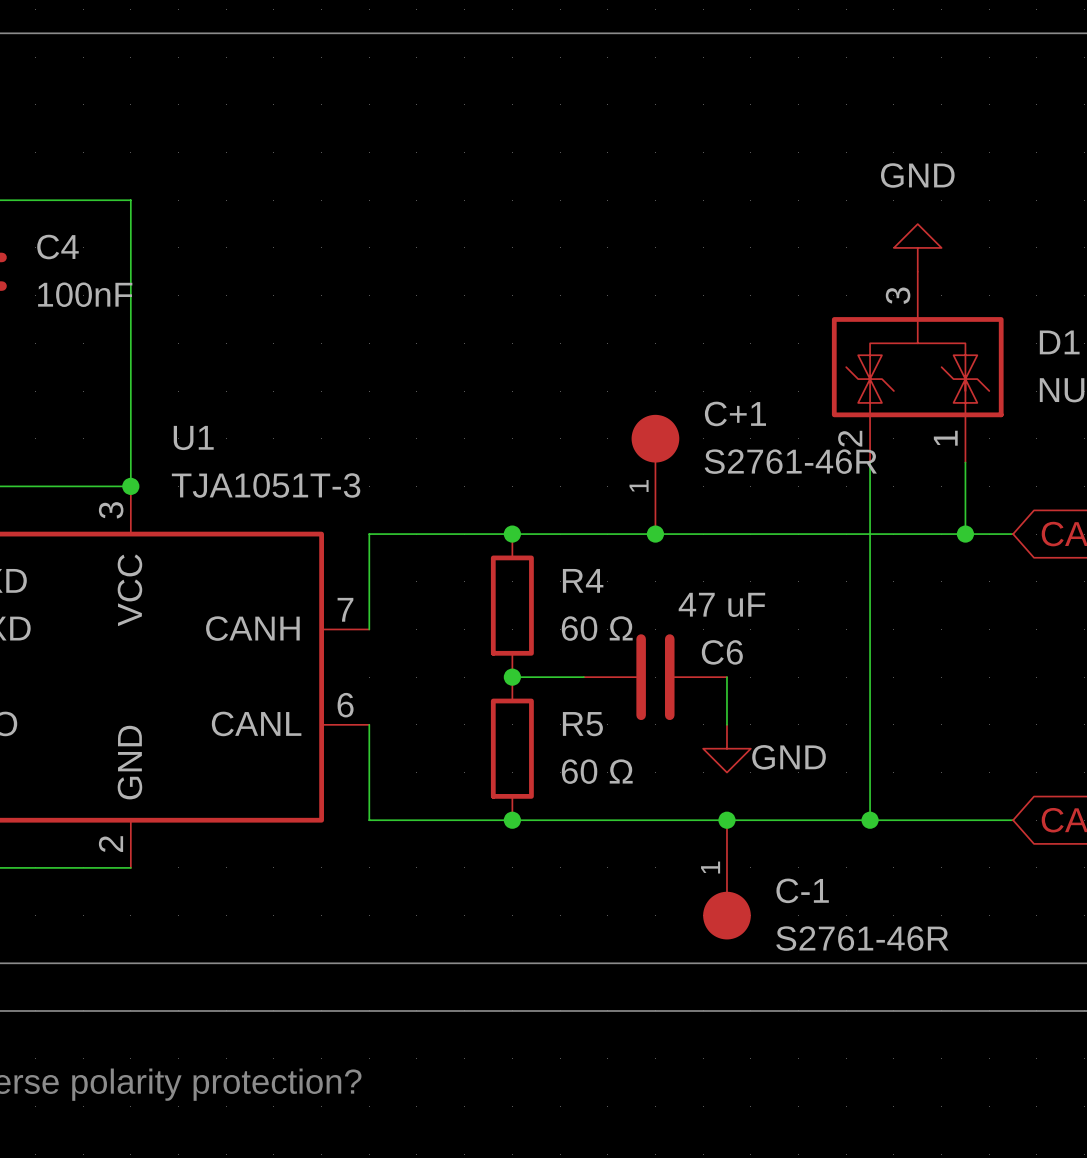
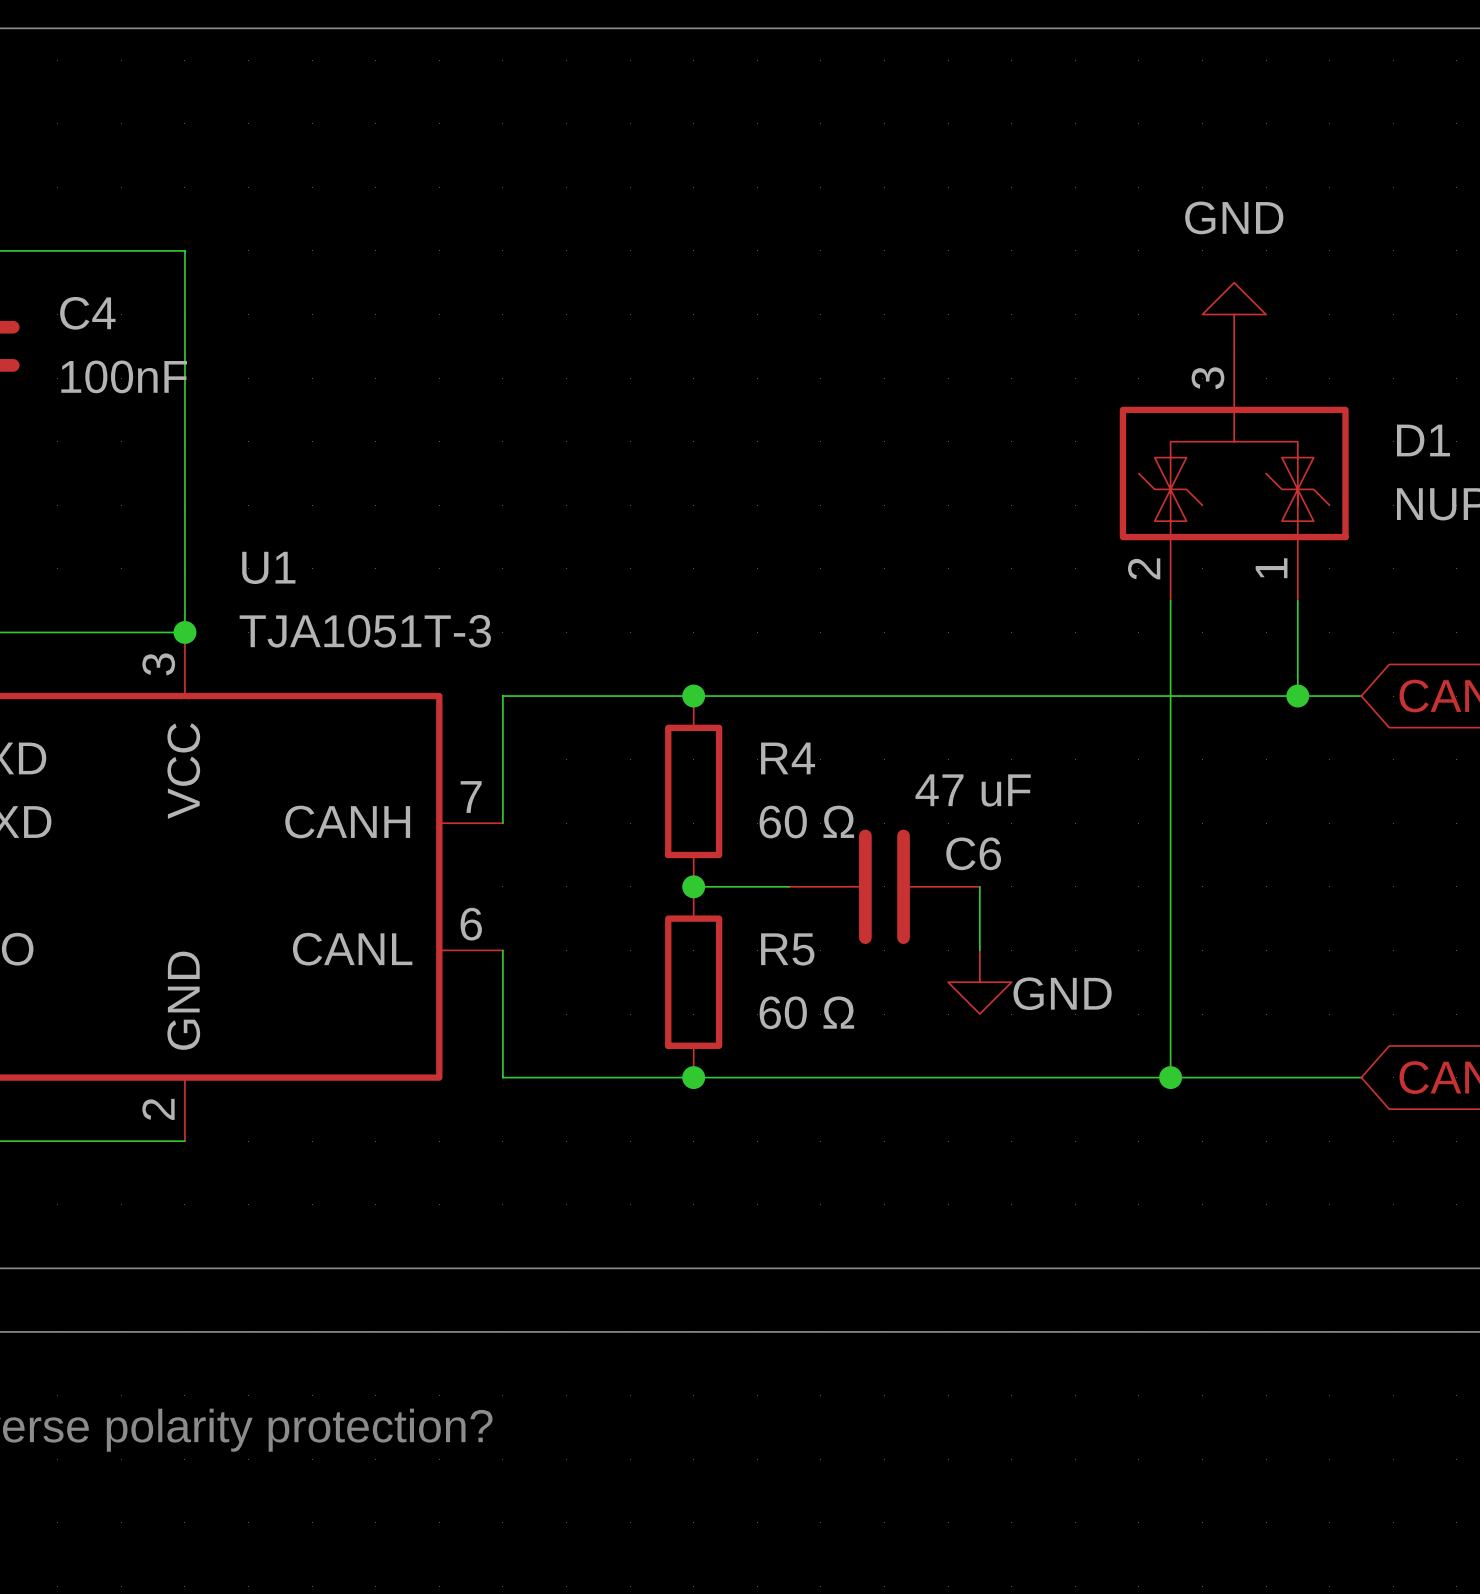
C+1: S2761-46R (655, 474) -> none
junction: (655, 534) -> none
junction: (726, 820) -> none
C-1: S2761-46R (726, 879) -> none

